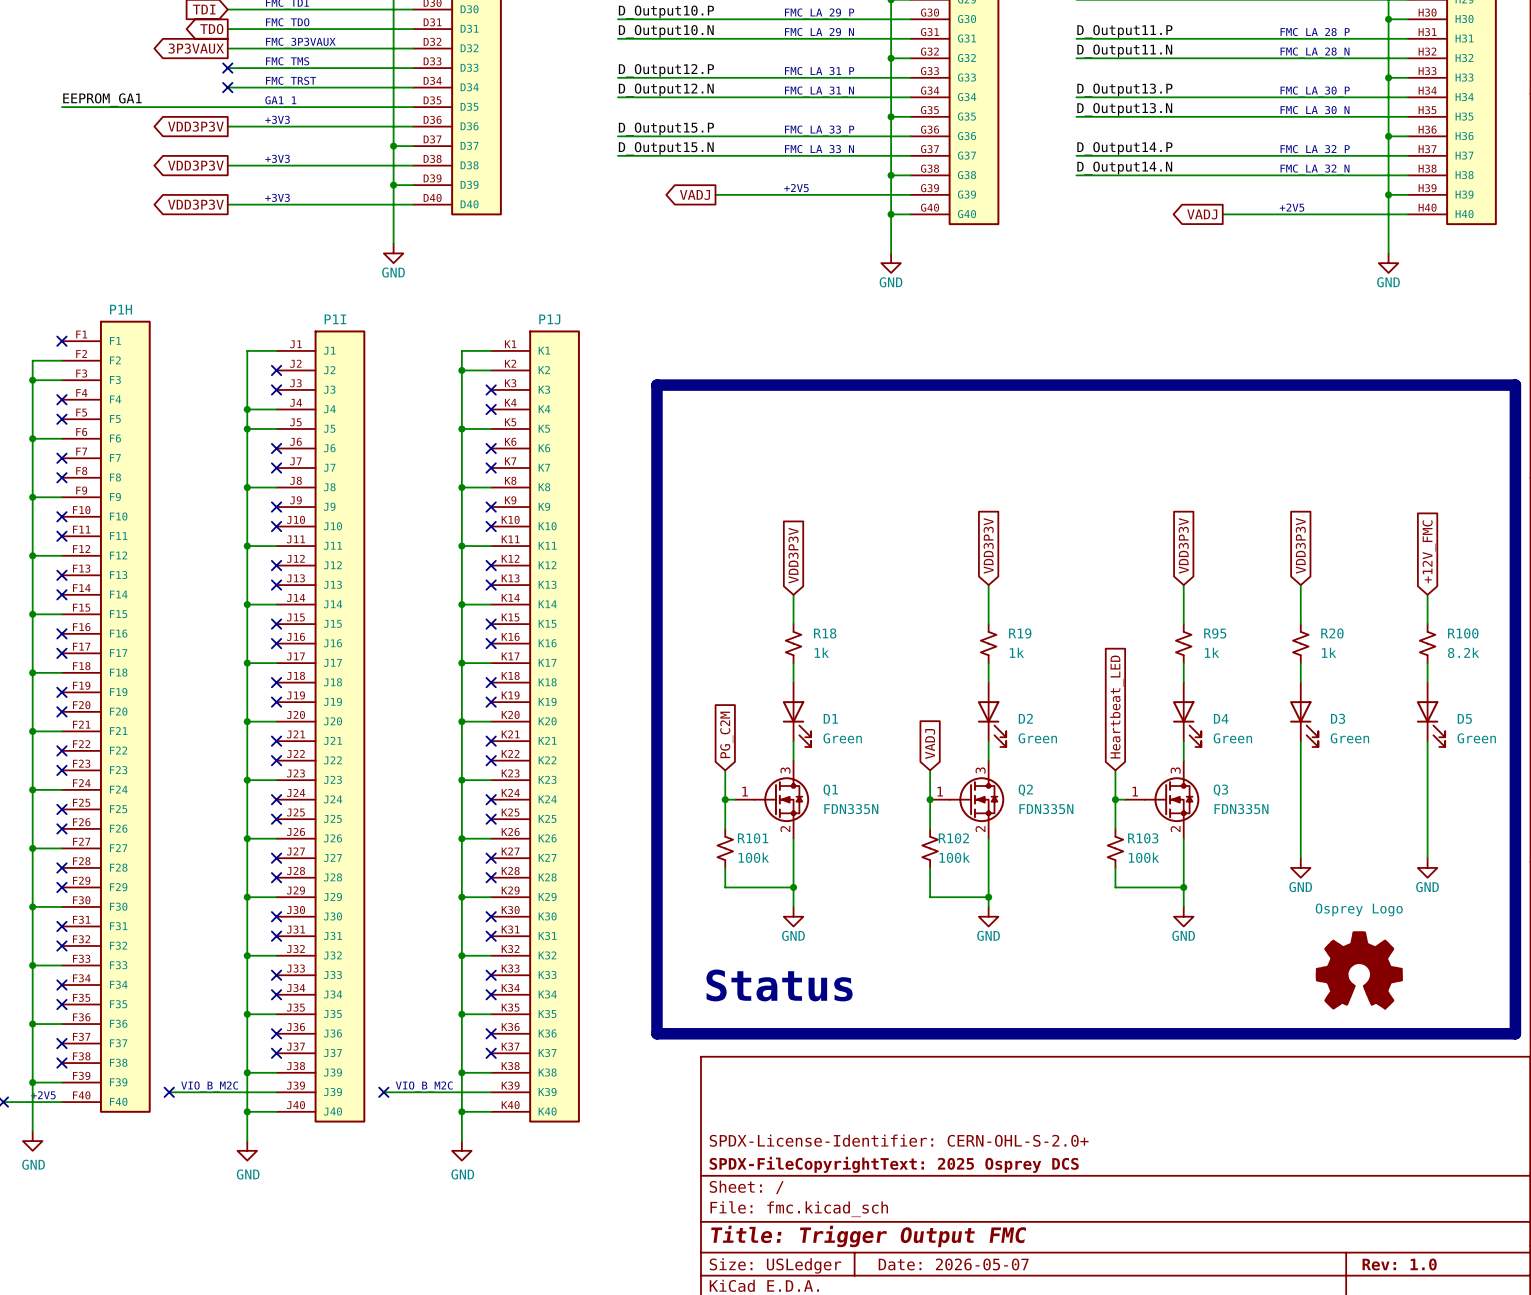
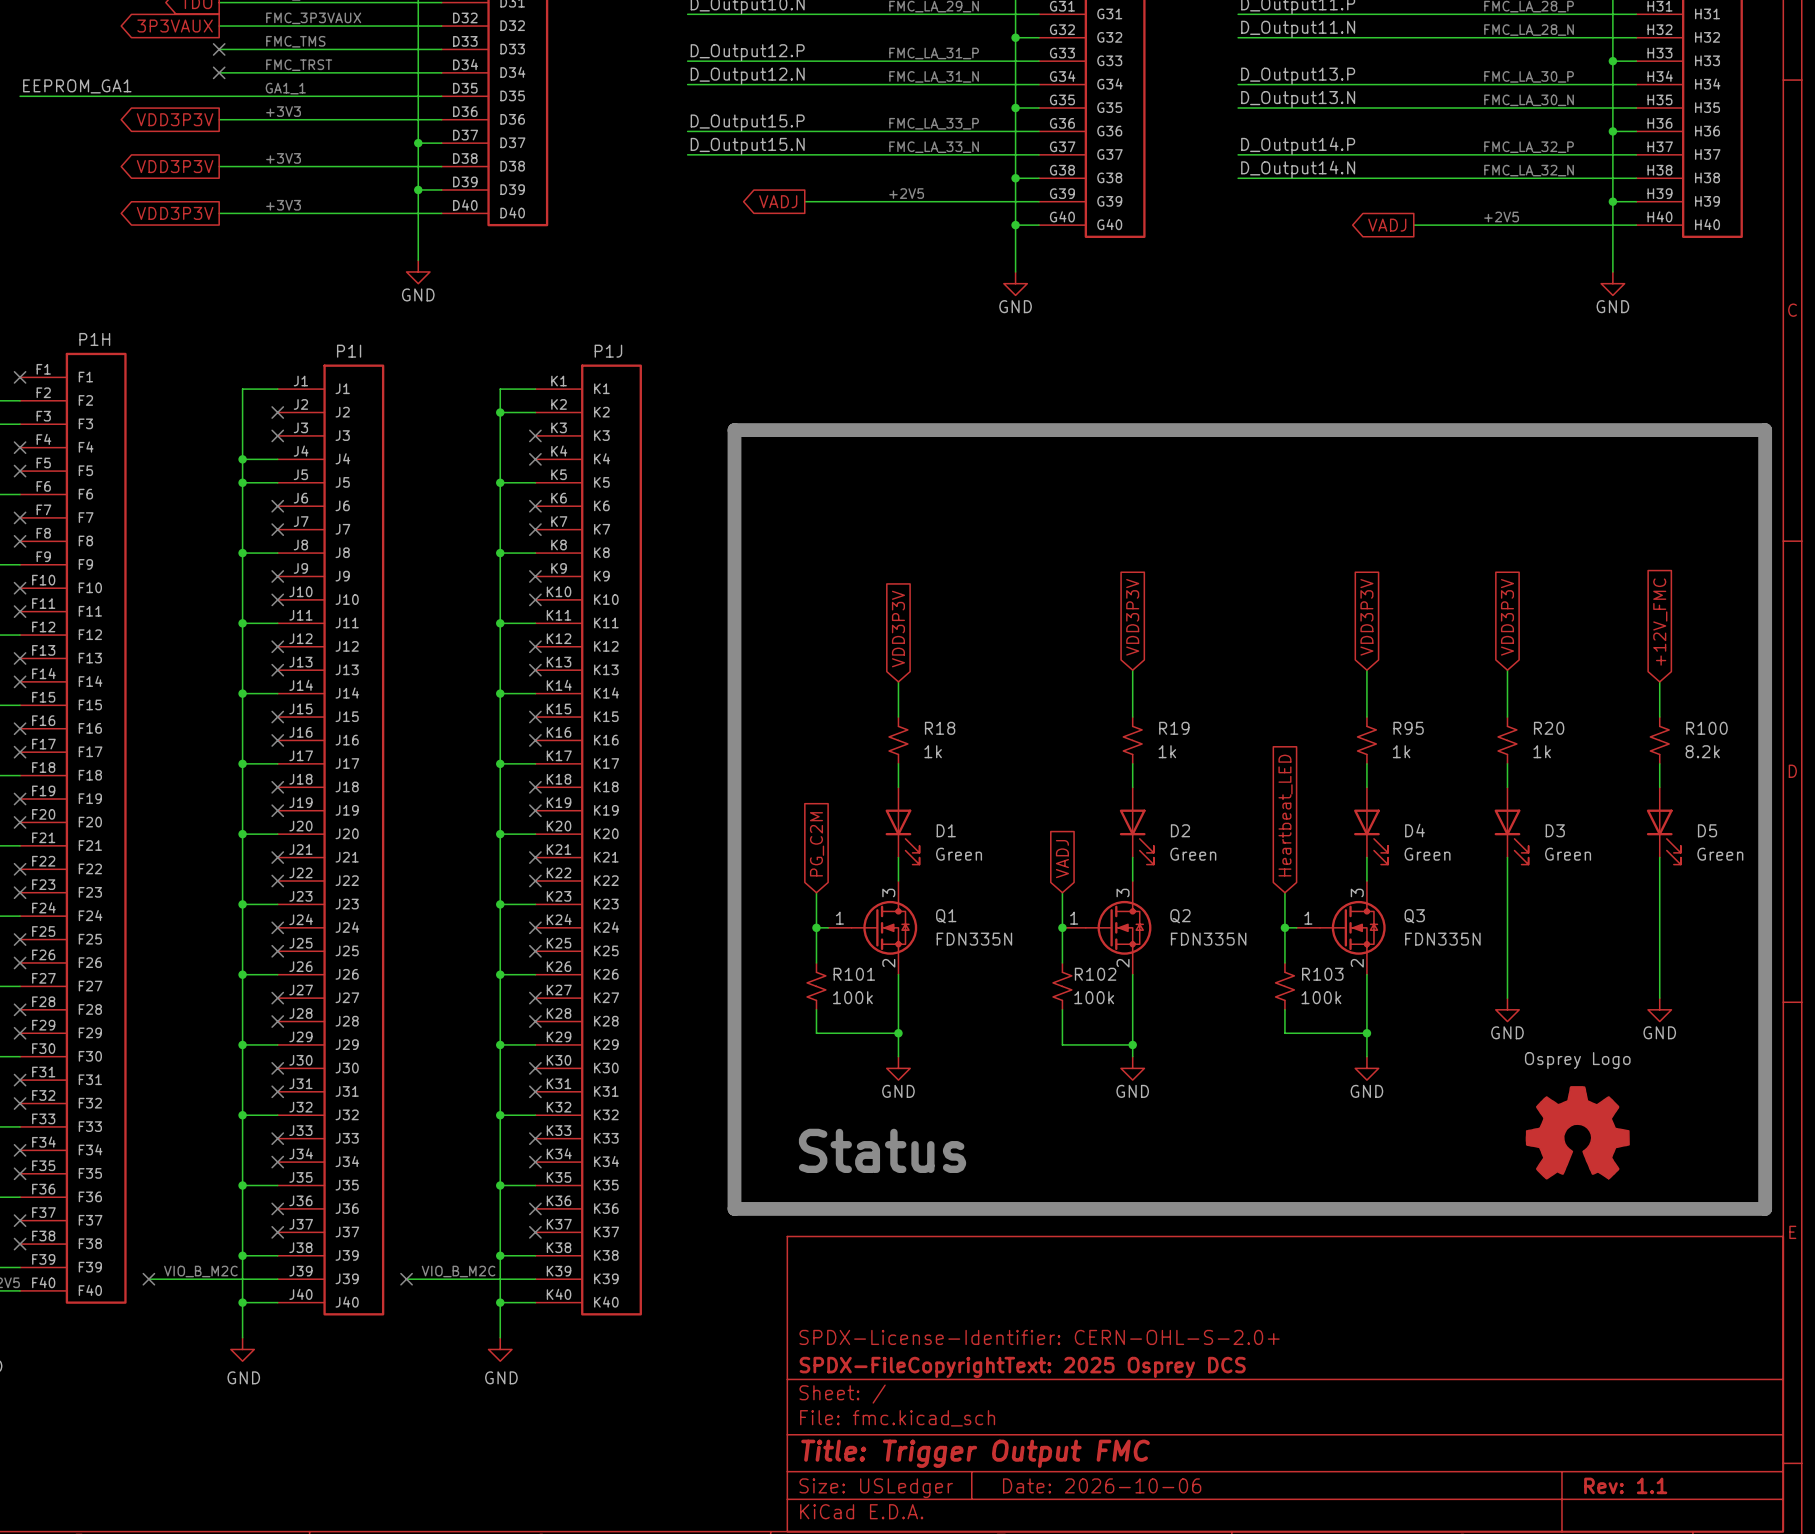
title block: Date: 2026-05-07 (953, 1264) -> Date: 2026-10-06 (1102, 1485)
title block: Rev: 1.0 (1399, 1264) -> Rev: 1.1 (1625, 1485)

